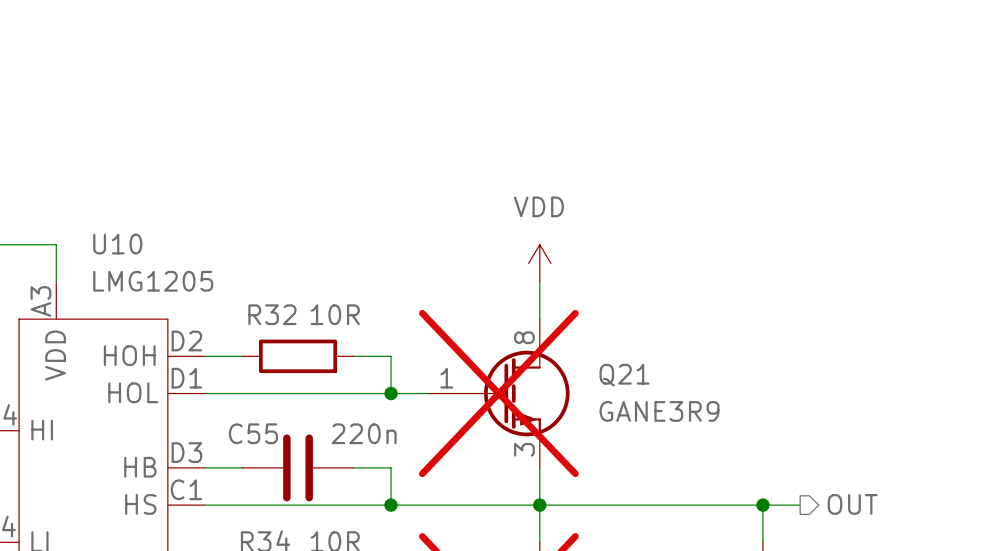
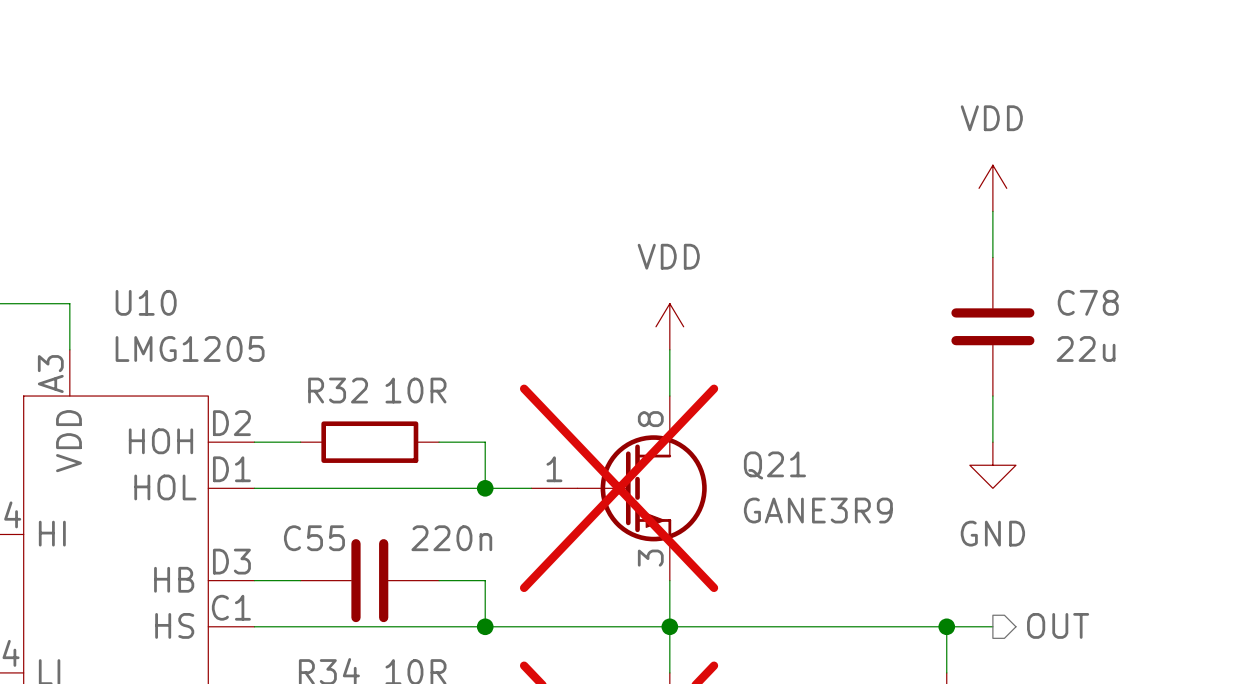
power symbol: none -> VDD (992, 188)
wire: none -> (992, 211) (992, 257)
C78: none -> 22u (992, 326)
wire: none -> (992, 396) (992, 442)
power symbol: none -> GND (992, 465)

